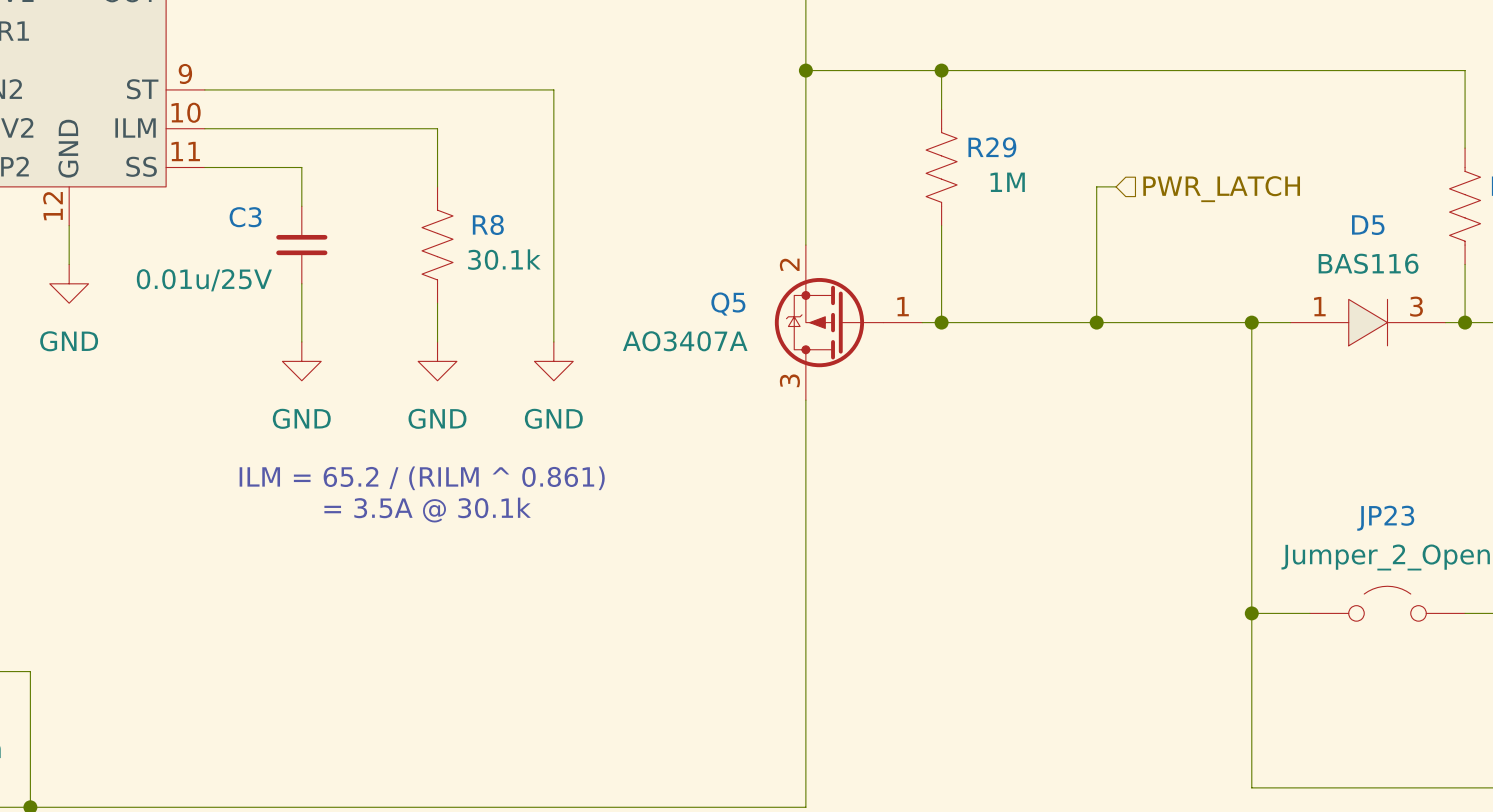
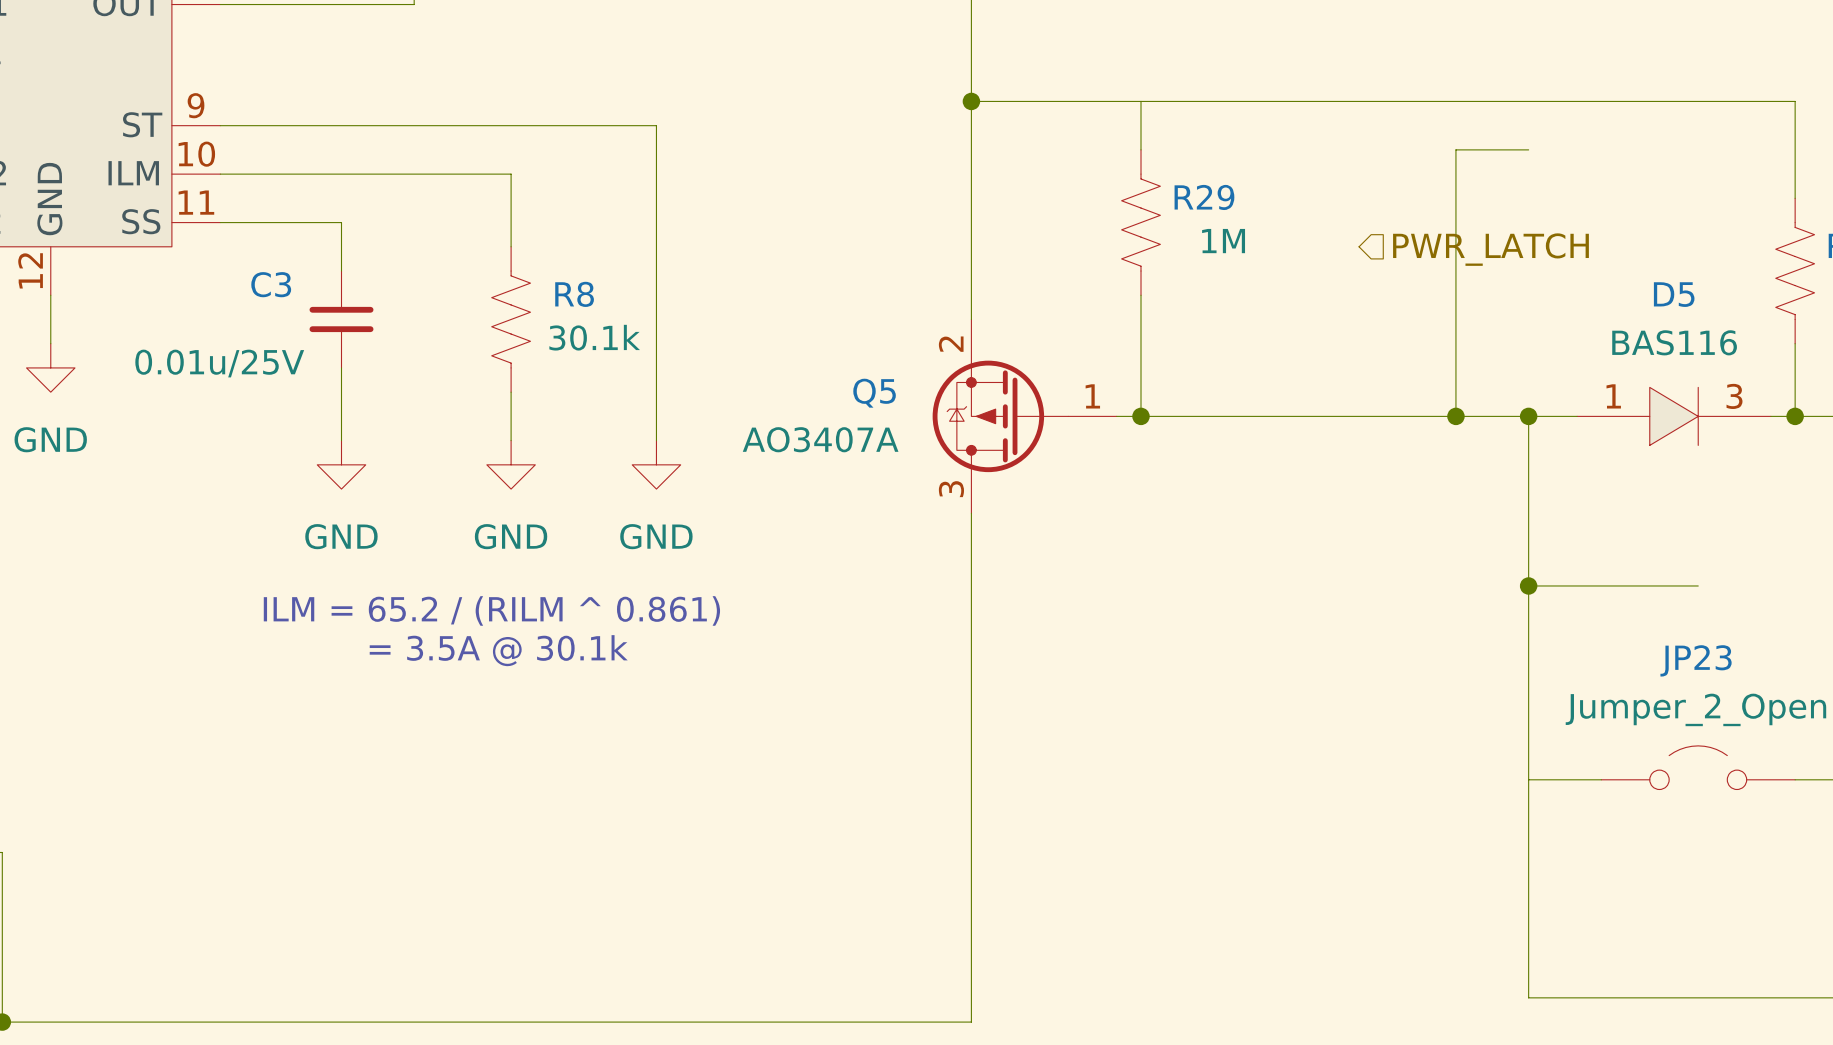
junction: (941, 70) -> none
wire: none -> (1528, 149) (1455, 149) (1455, 416)
wire: (1116, 186) (1096, 186) (1096, 322) -> none
junction: (1096, 322) -> none
junction: none -> (1455, 416)
wire: none -> (1528, 585) (1698, 585)
junction: none -> (1528, 585)
junction: (1251, 613) -> none

